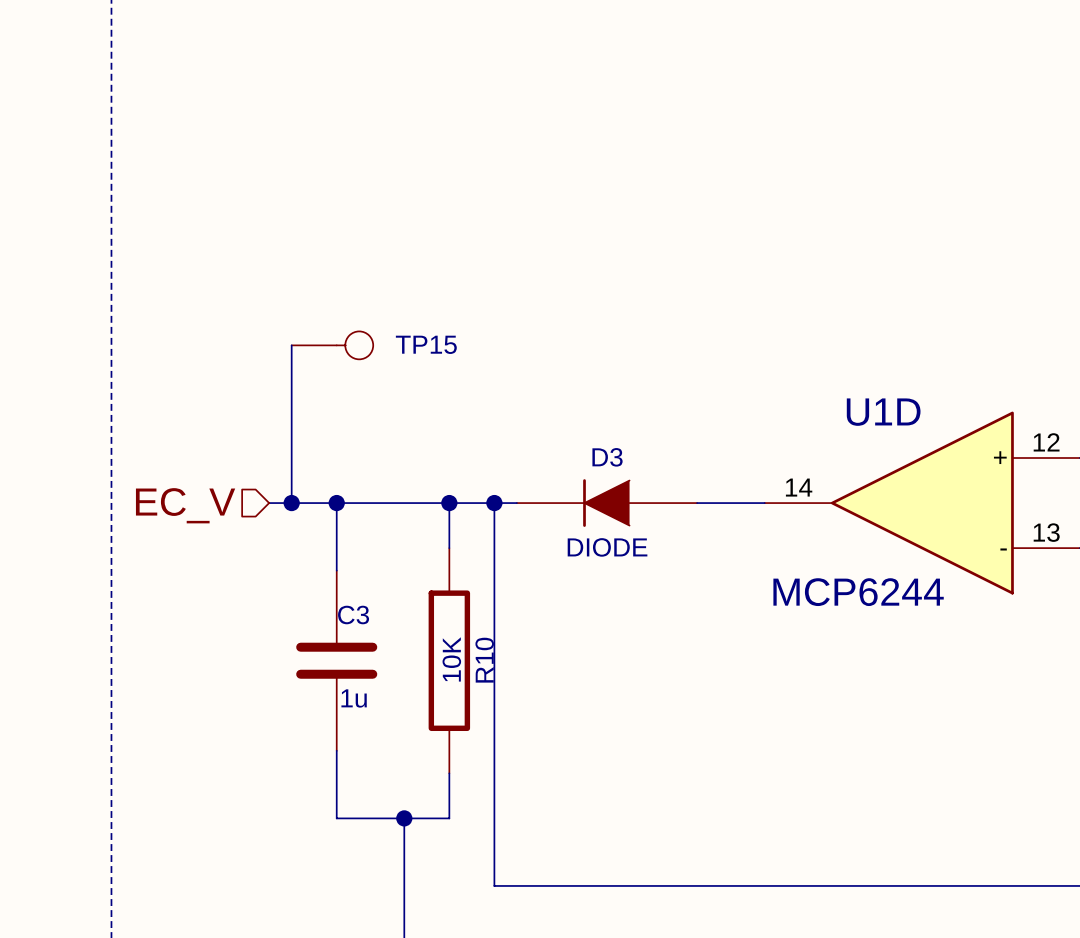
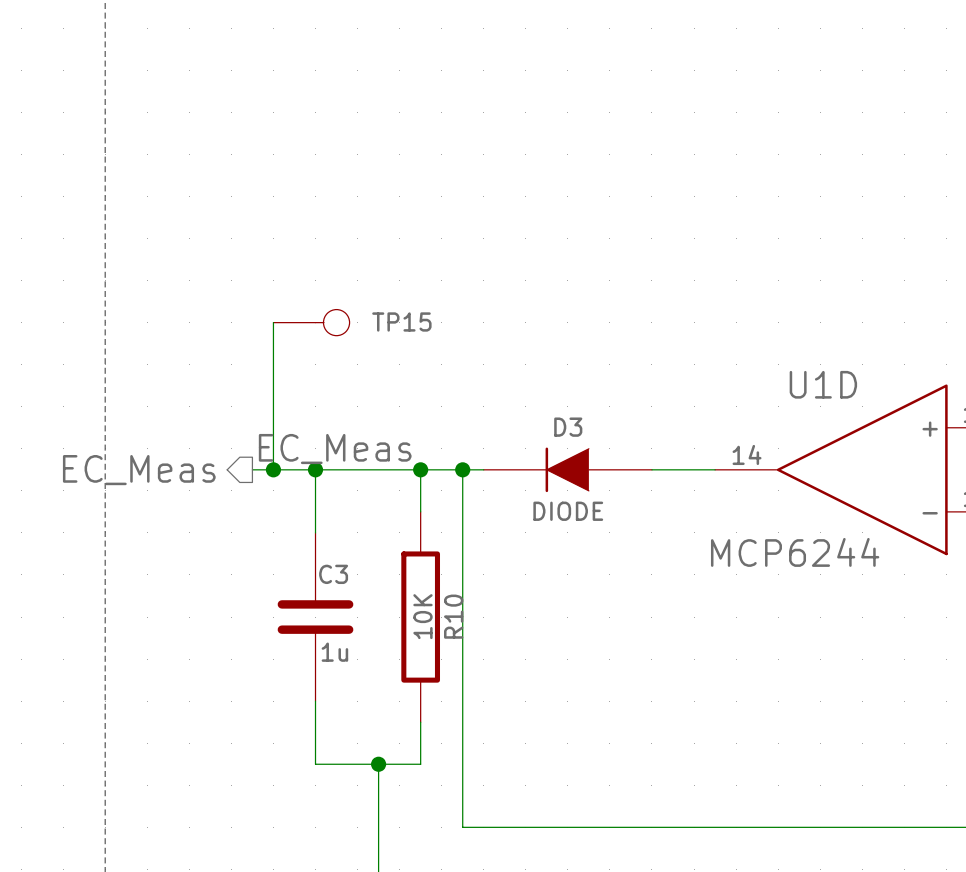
label: none -> EC_Meas (335, 449)
hierarchical label shape: input (185, 505) -> output (139, 470)
hierarchical label: EC_V (185, 505) -> EC_Meas (139, 470)

